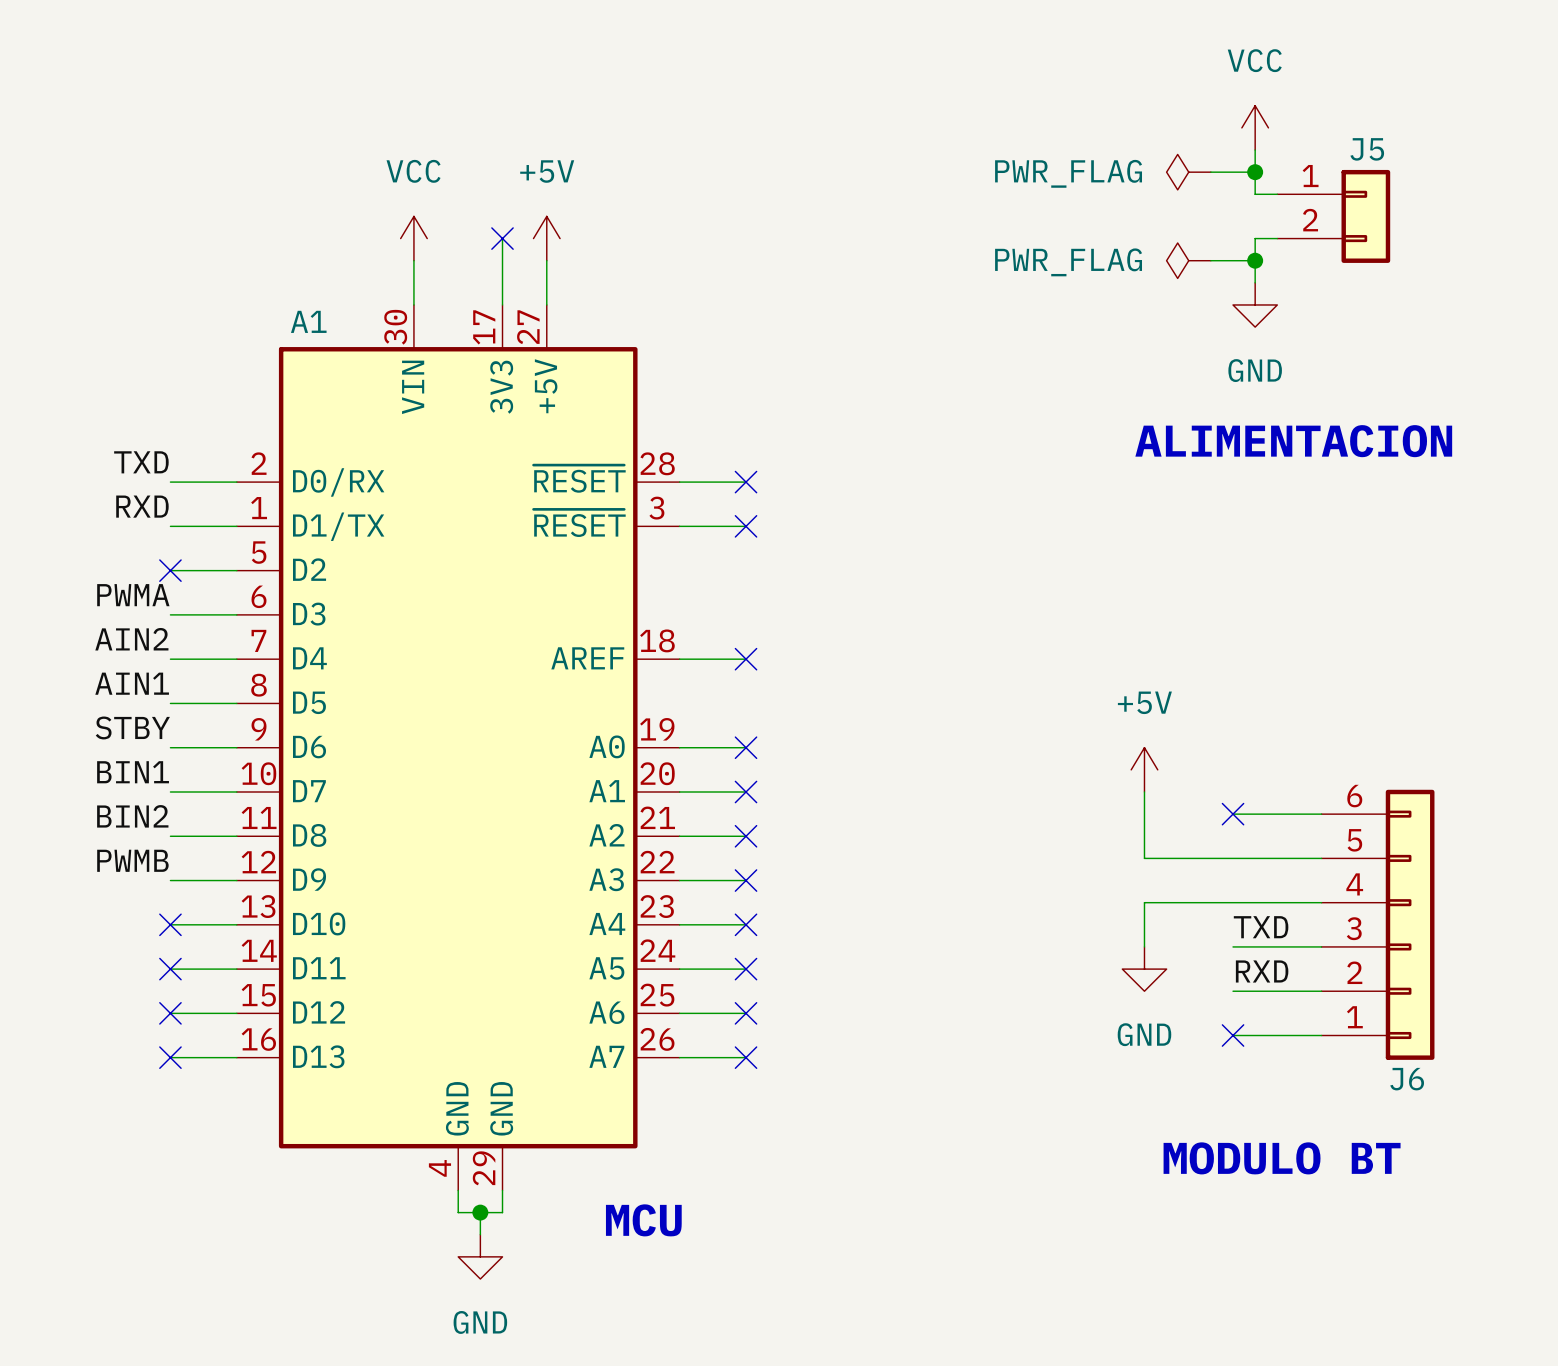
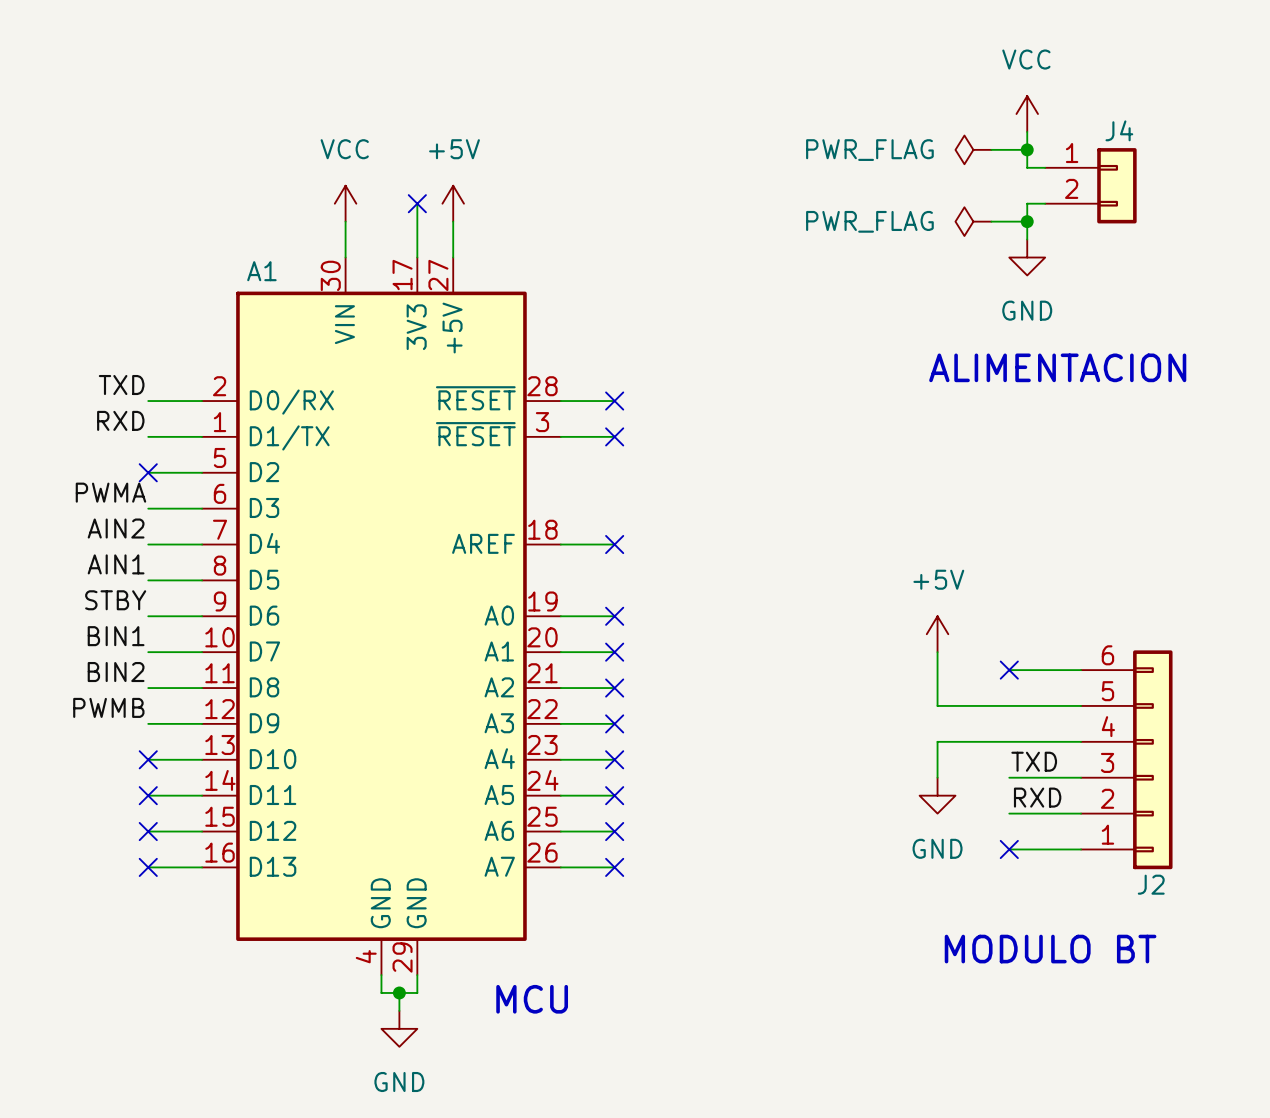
J5 name: J5 (1367, 149) -> J4 (1119, 130)
J6 name: J6 (1407, 1079) -> J2 (1151, 884)

